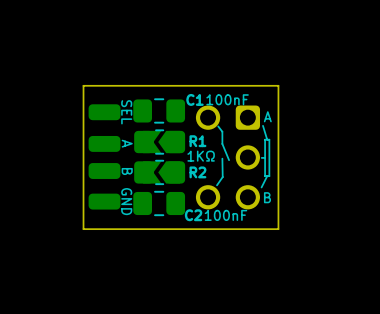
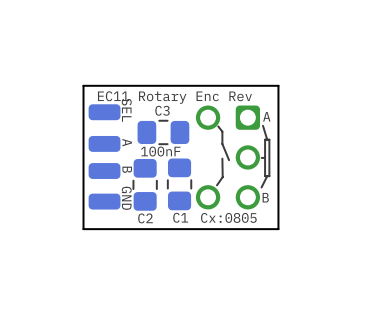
text: none -> EC11 Rotary Enc Rev (174, 97)
text position: 100nF (227, 99) -> 100nF (160, 151)
C1 rotation: 0° (159, 110) -> 90° clockwise (179, 184)
C1 position: (159, 110) -> (179, 184)
C3: none -> (163, 132)
R1: (159, 142) -> none
text: 1KΩ (201, 156) -> none
R2: (159, 172) -> none
C2 rotation: 0° (159, 203) -> 90° clockwise (145, 184)
text: 100nF (225, 215) -> Cx:0805 (228, 217)

